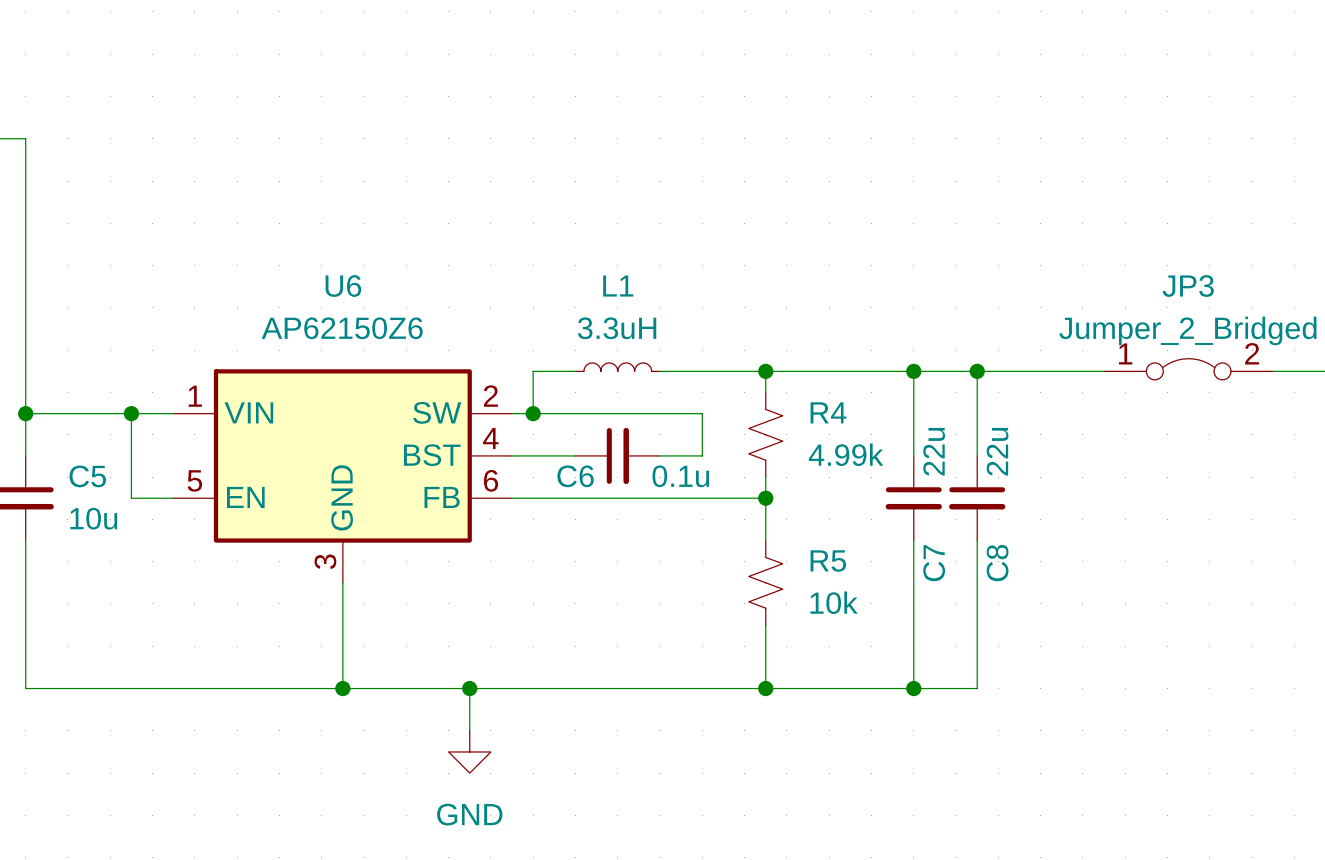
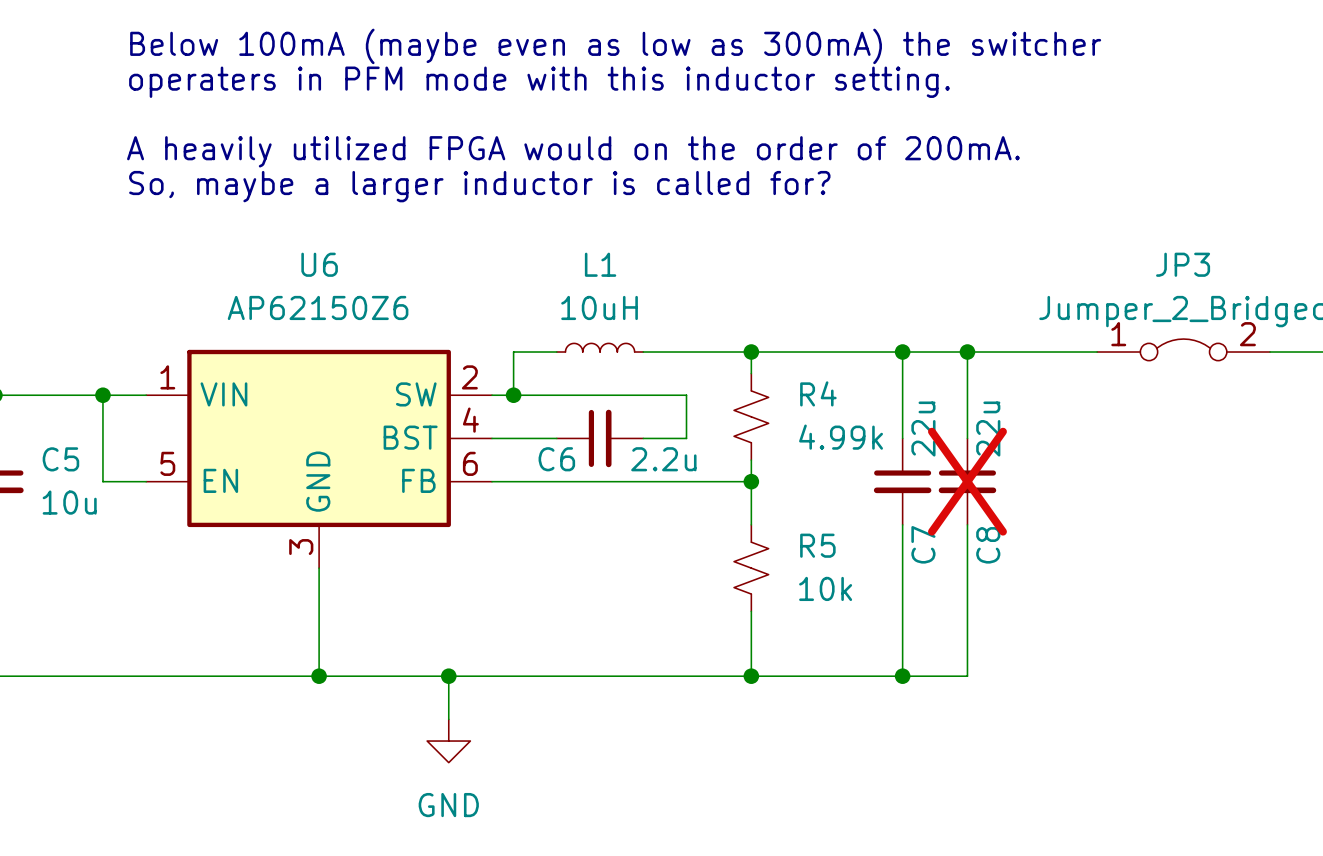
text: none -> Below 100mA (maybe even as low as 300mA) the switcher (615, 46)
text: none -> operaters in PFM mode with this inductor setting. (539, 82)
text: none -> A heavily utilized FPGA would on the order of 200mA. (573, 151)
text: none -> So, maybe a larger inductor is called for? (479, 186)
L1 value: 3.3uH (617, 328) -> 10uH (599, 307)
C6 value: 0.1u (680, 476) -> 2.2u (663, 459)
C8 do-not-place cross: none -> (967, 481)

